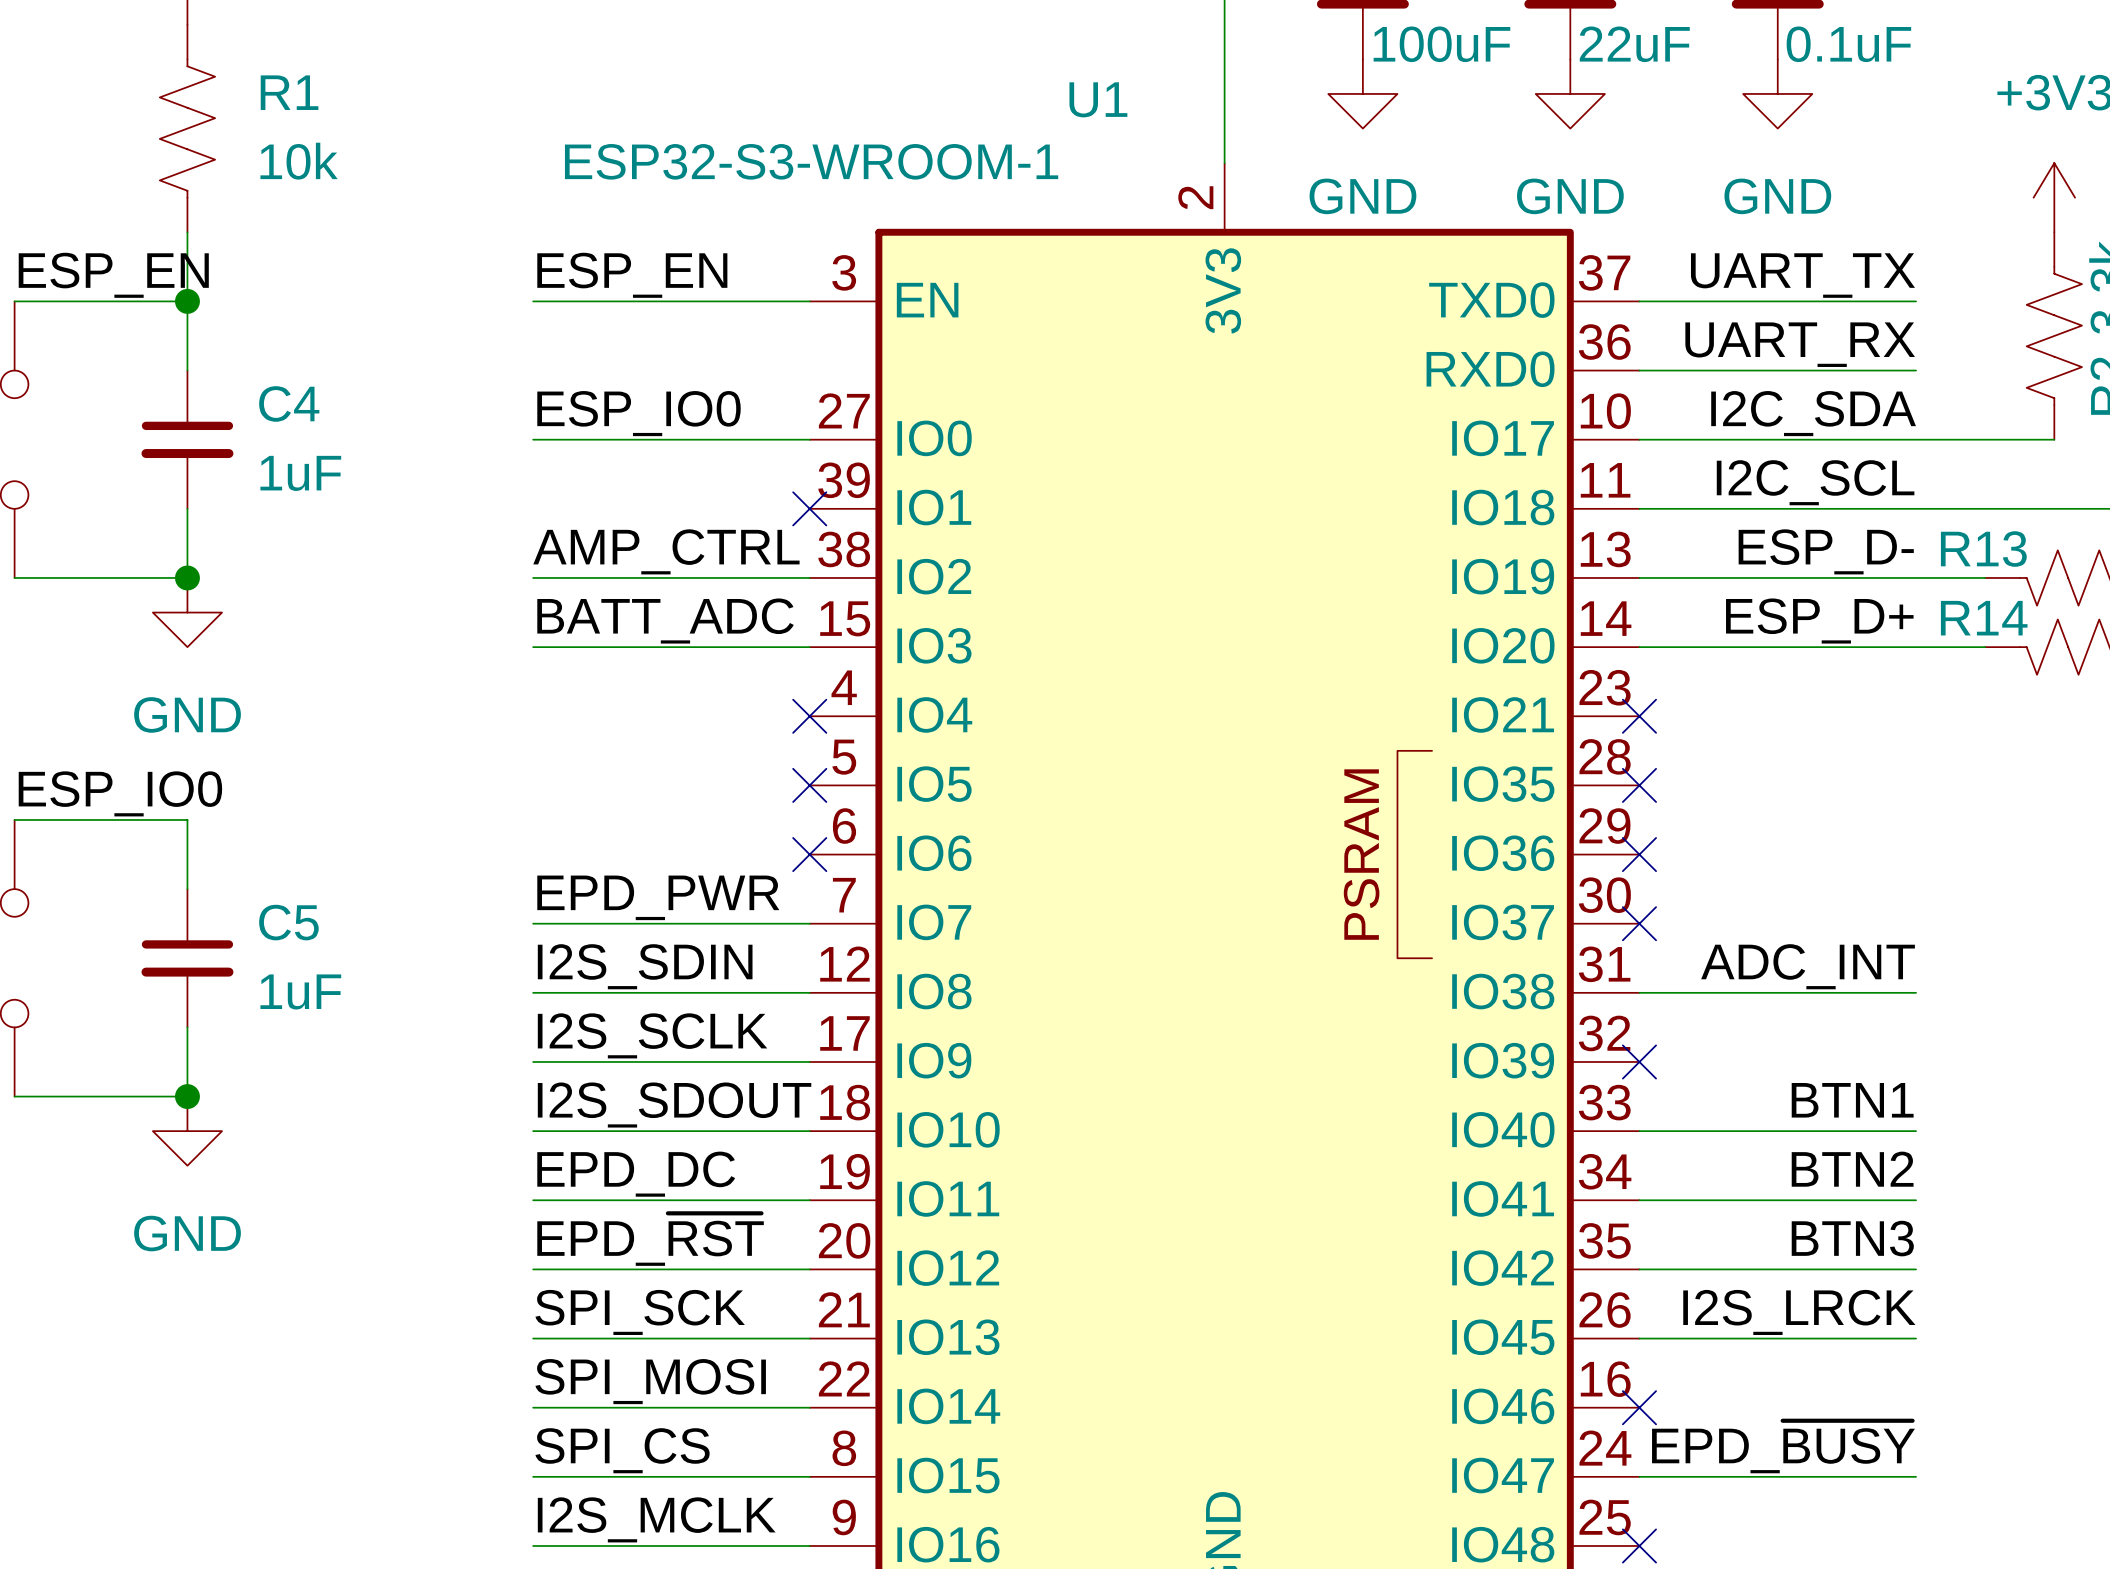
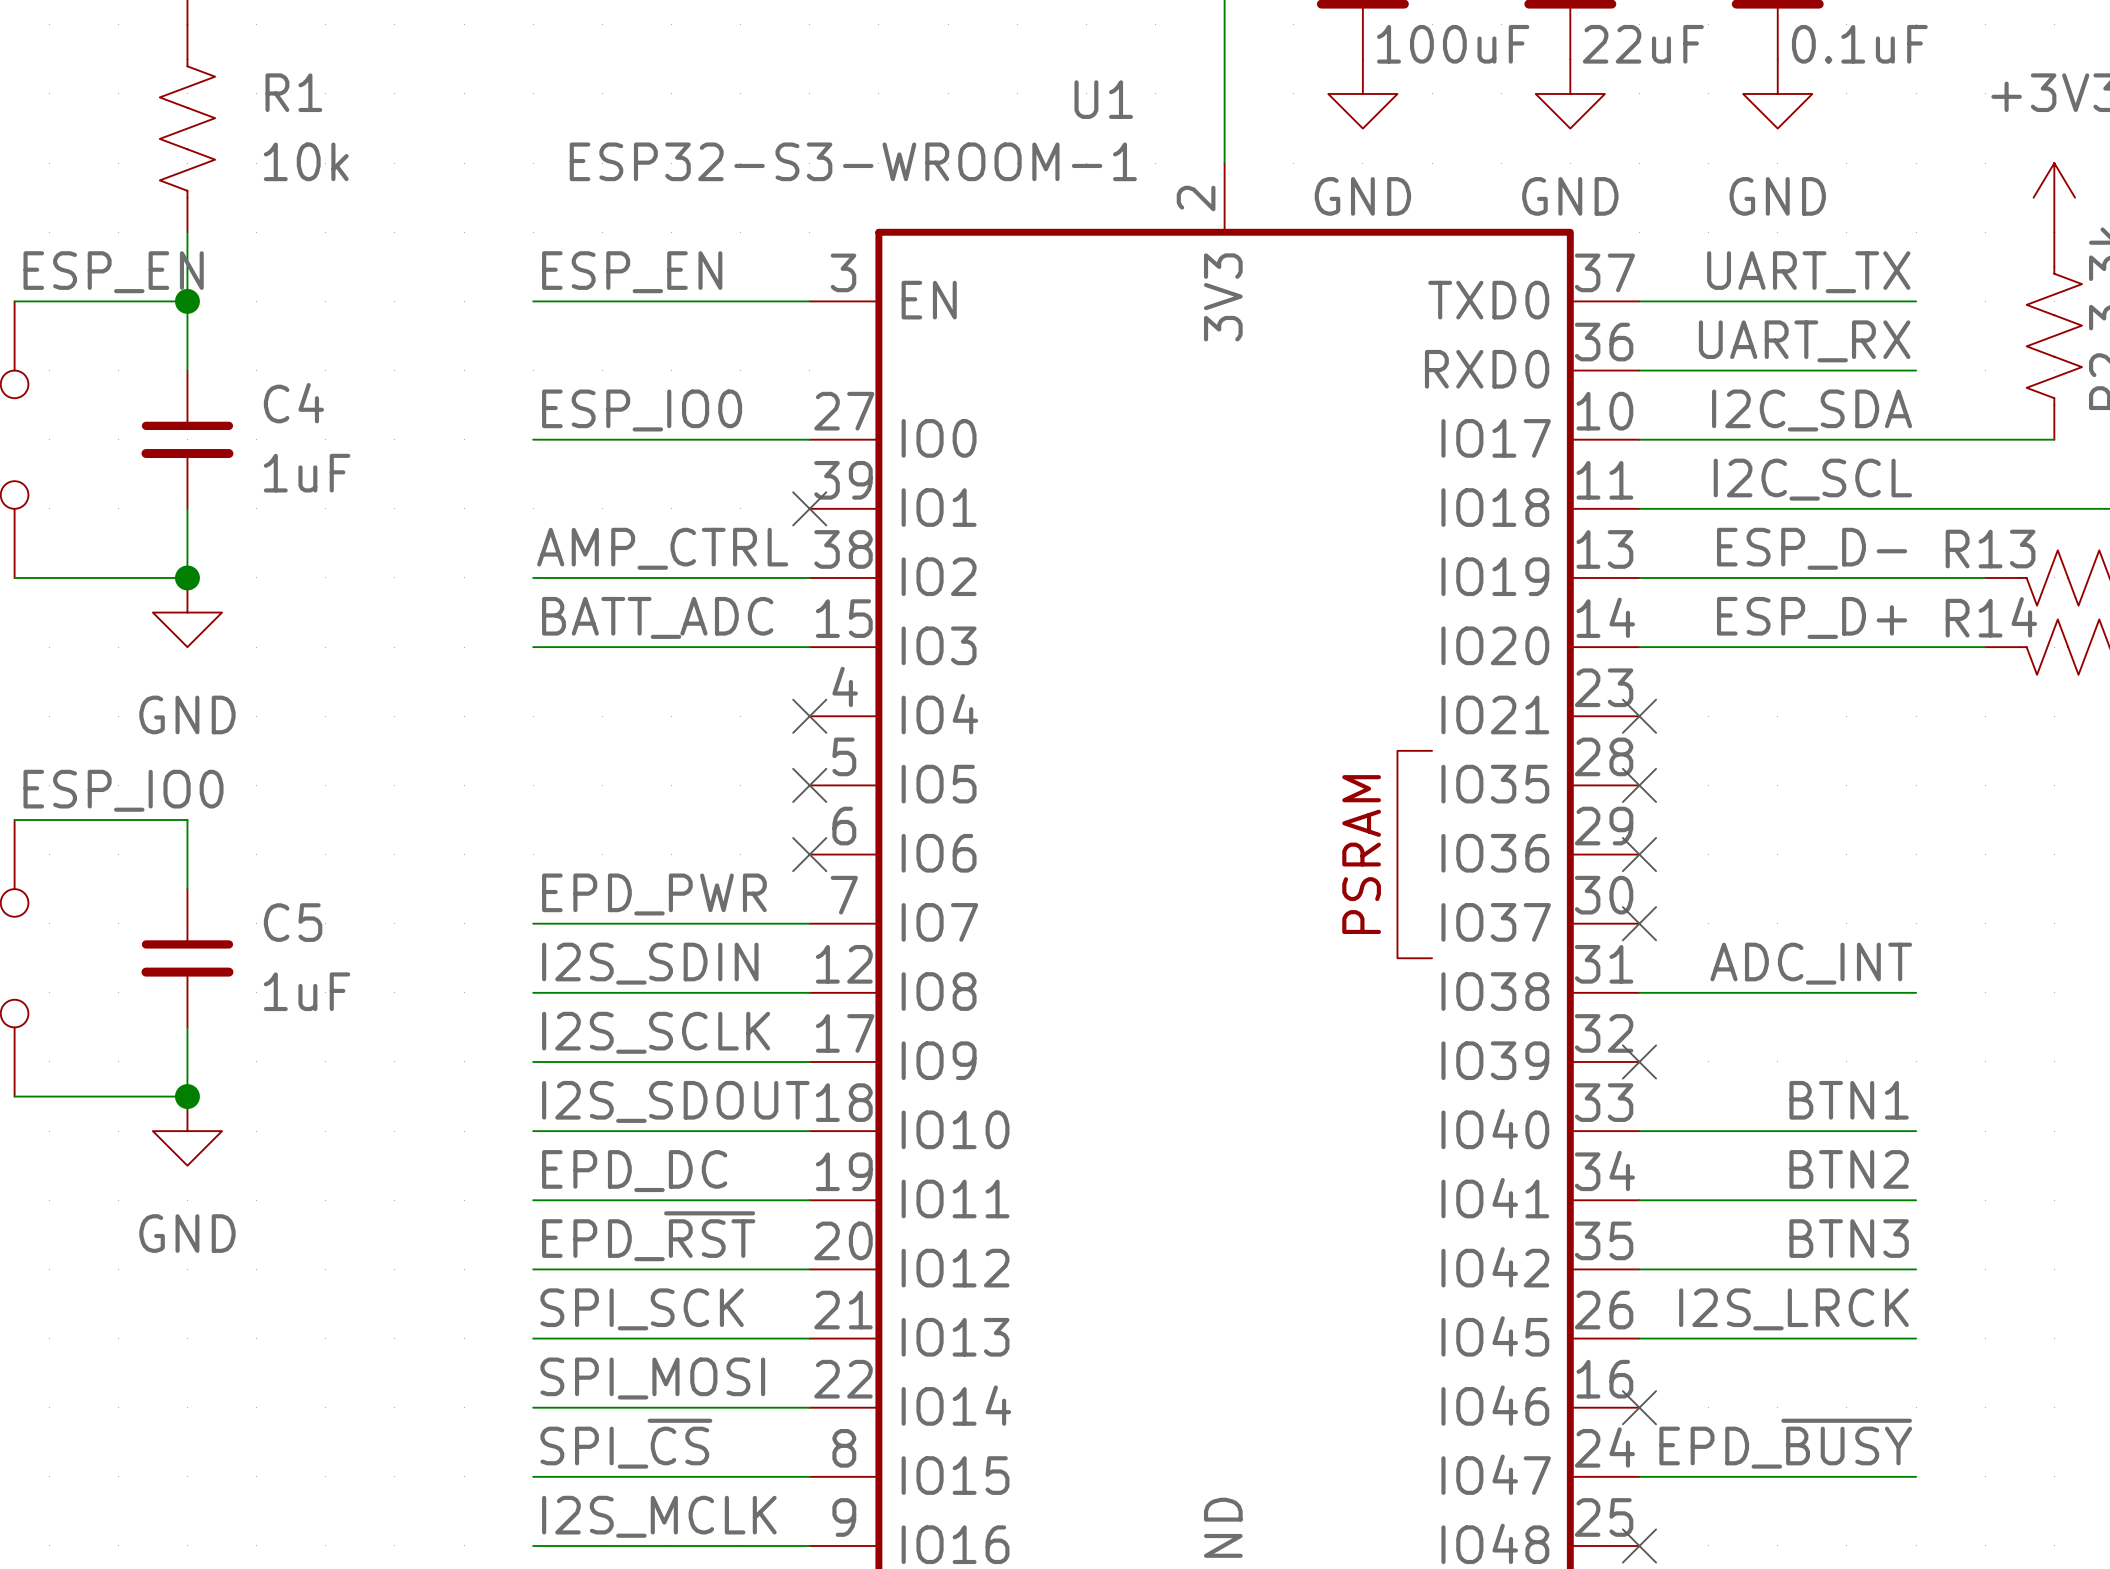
label: SPI_CS (622, 1450) -> SPI_~{CS} (626, 1443)

